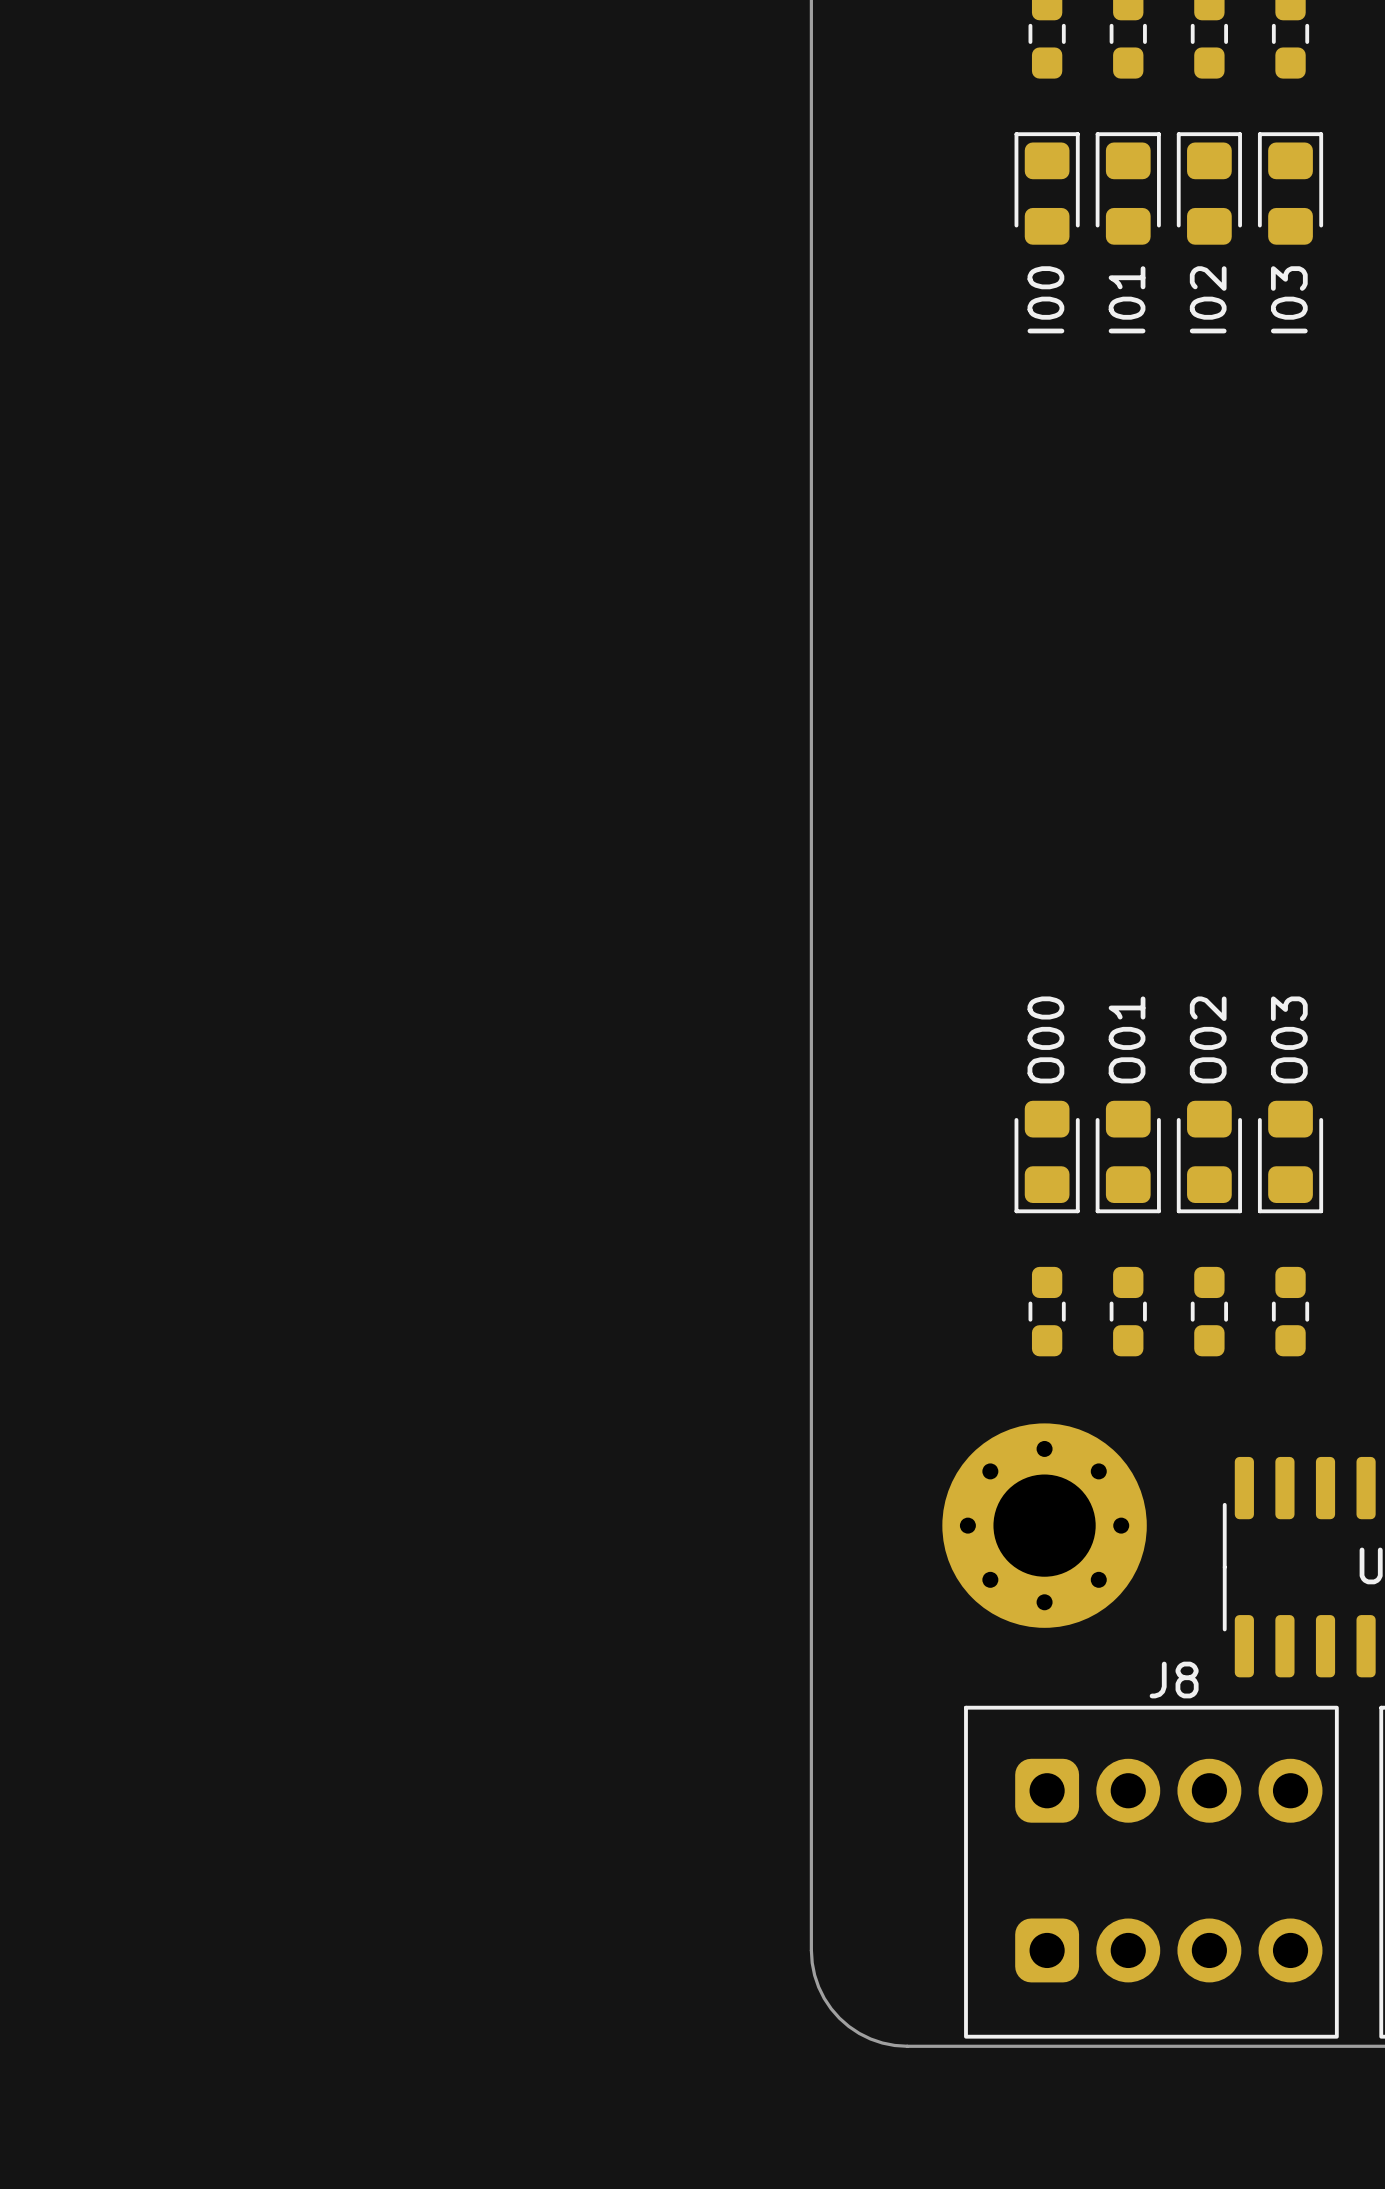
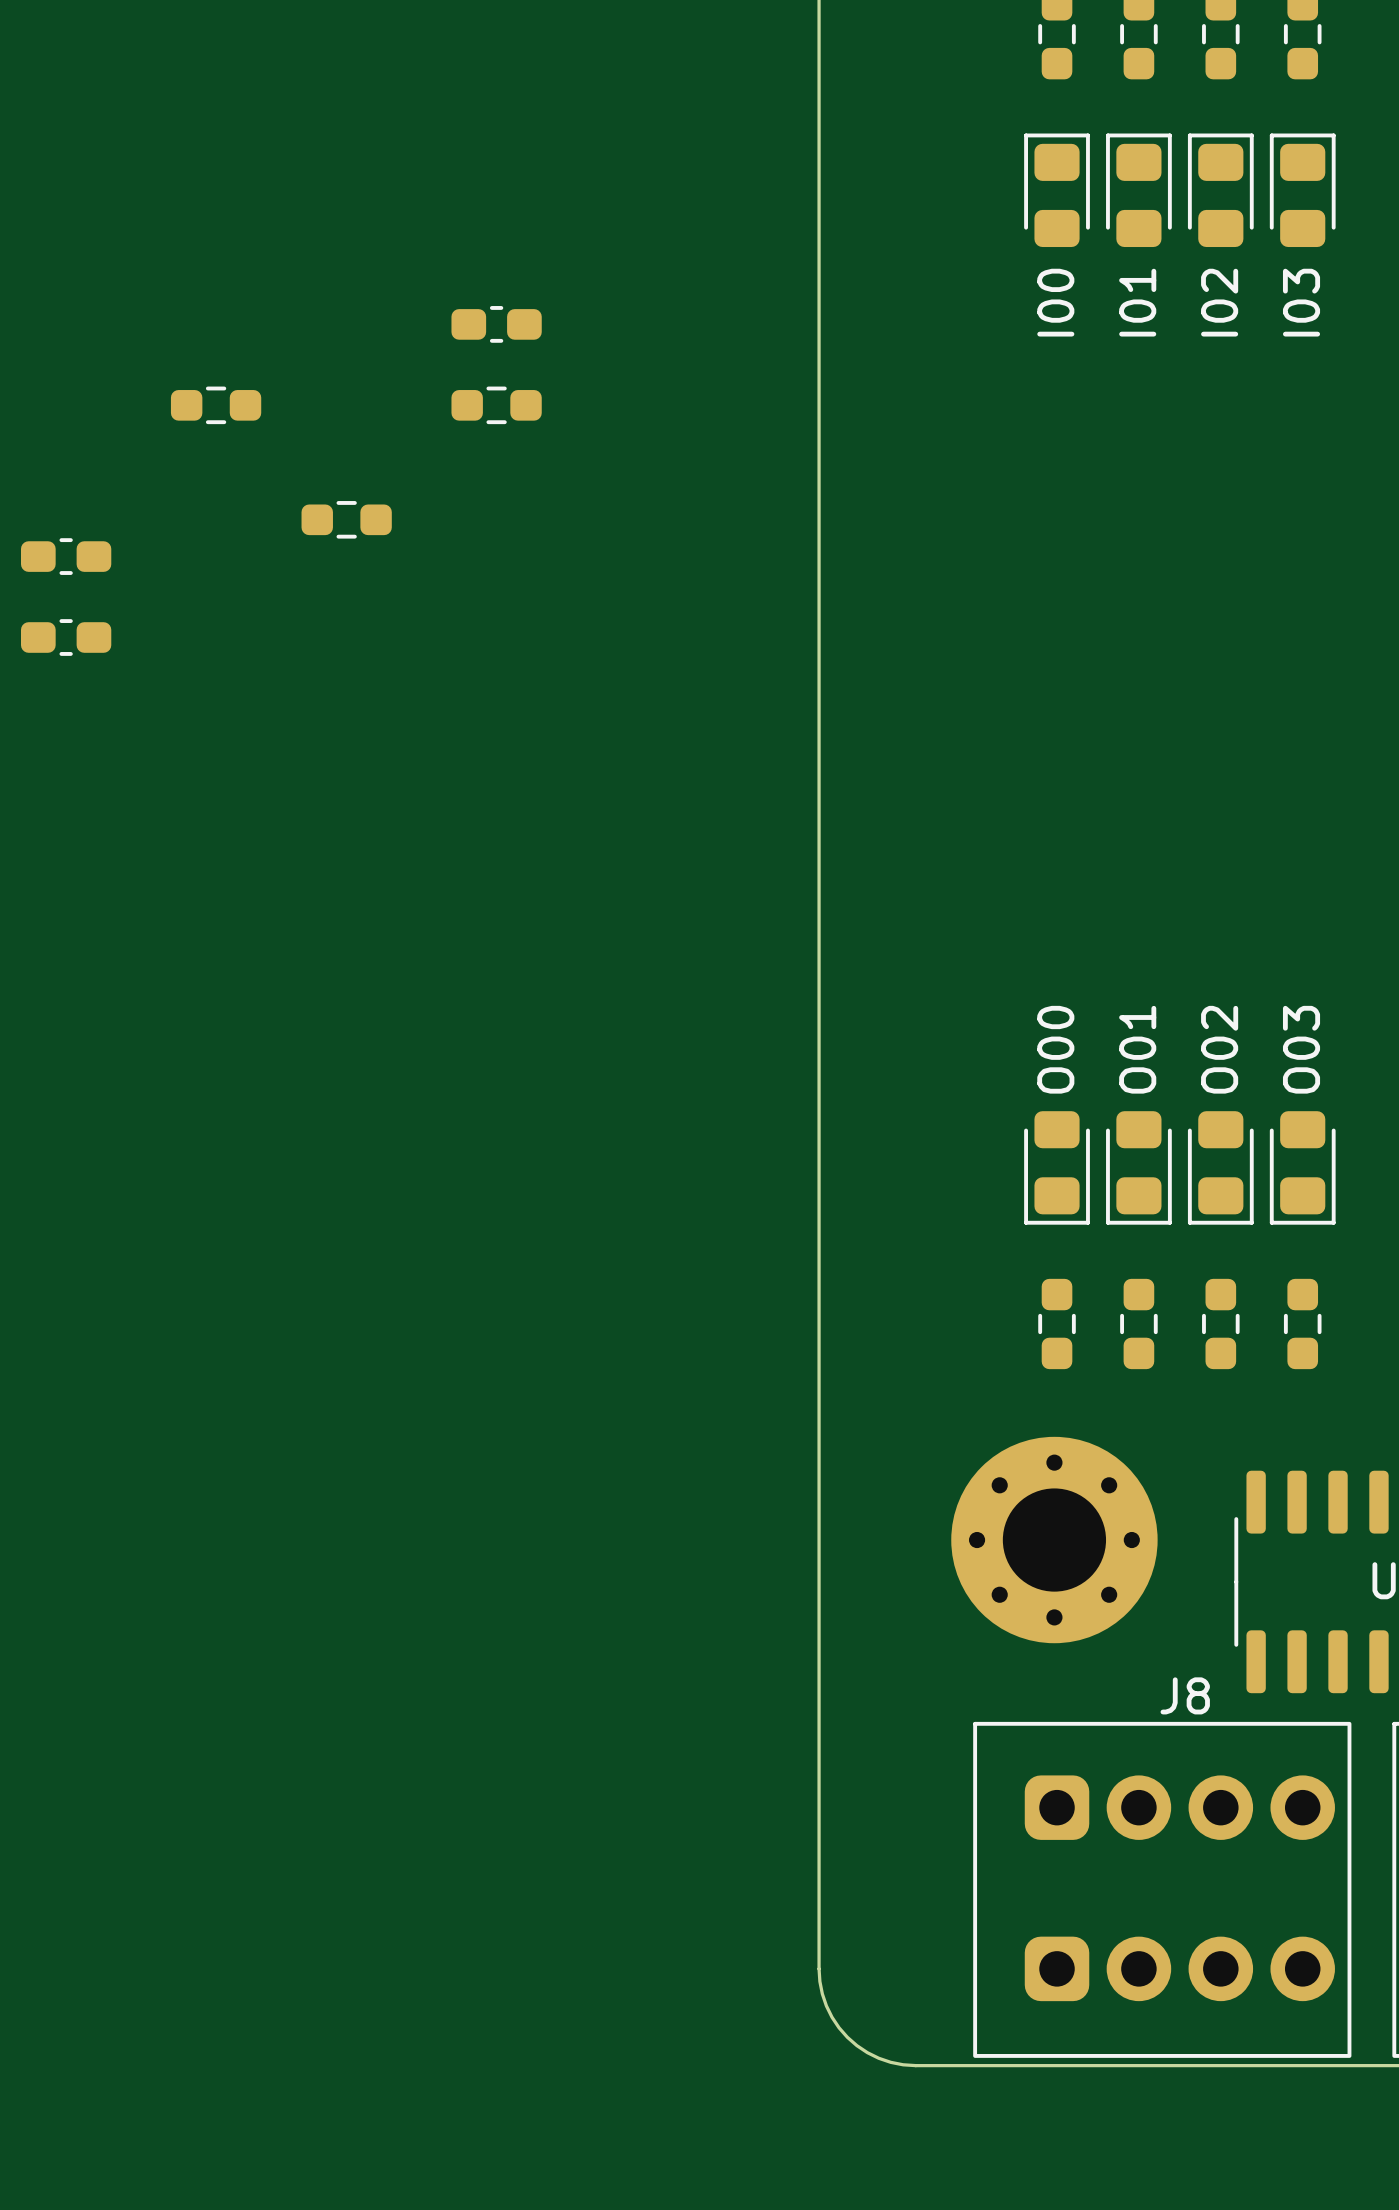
part: none -> (496, 324)
part: none -> (216, 405)
part: none -> (496, 405)
part: none -> (346, 519)
part: none -> (66, 556)
part: none -> (66, 637)

